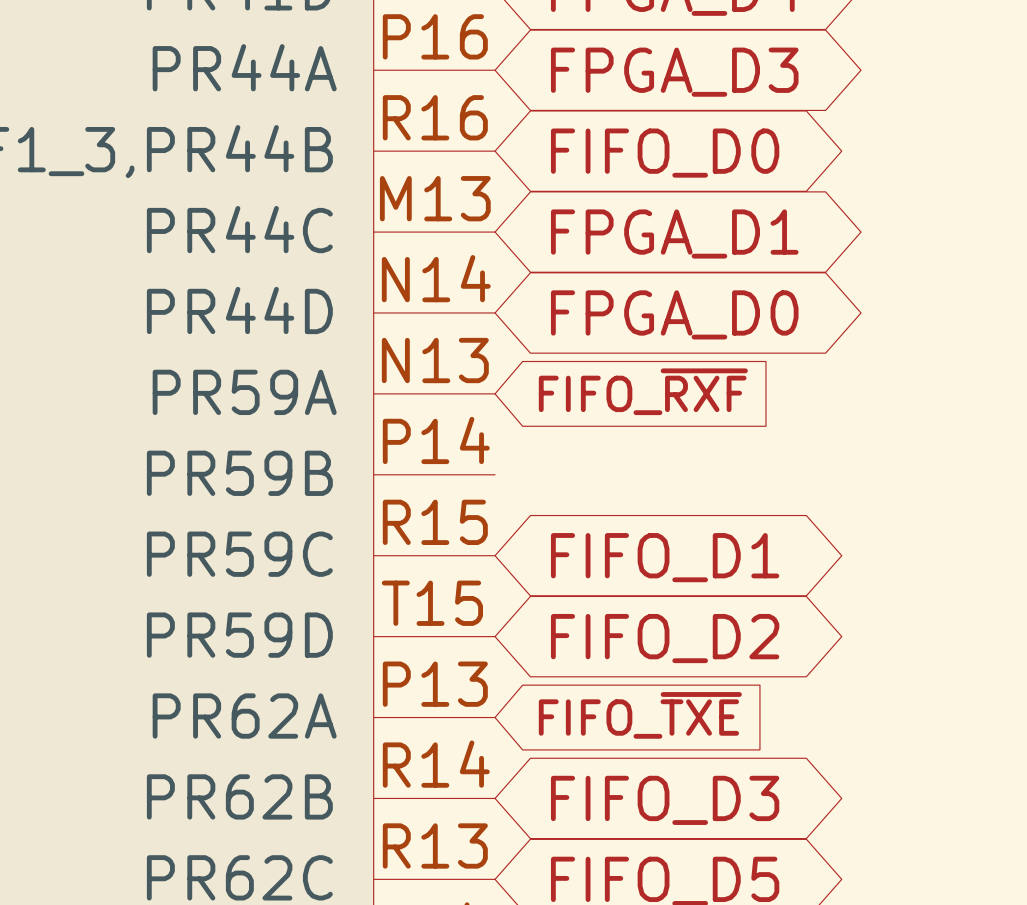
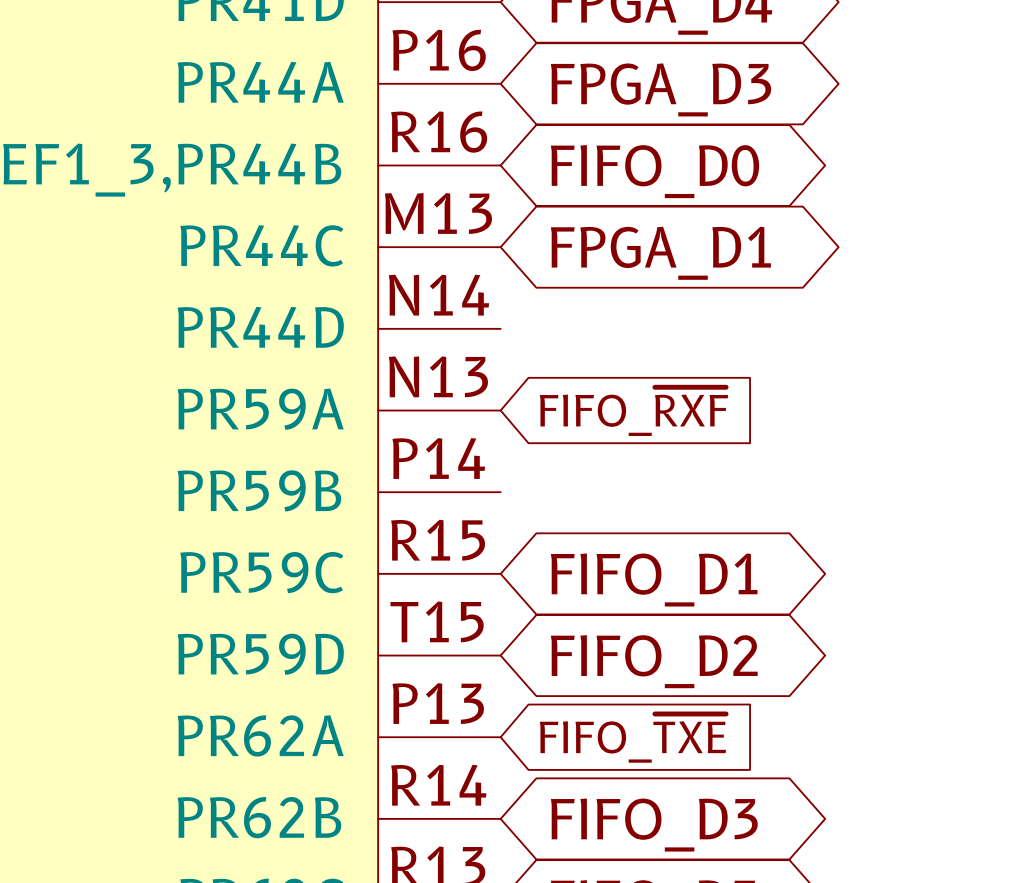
global label: FPGA_D0 (674, 314) -> none

